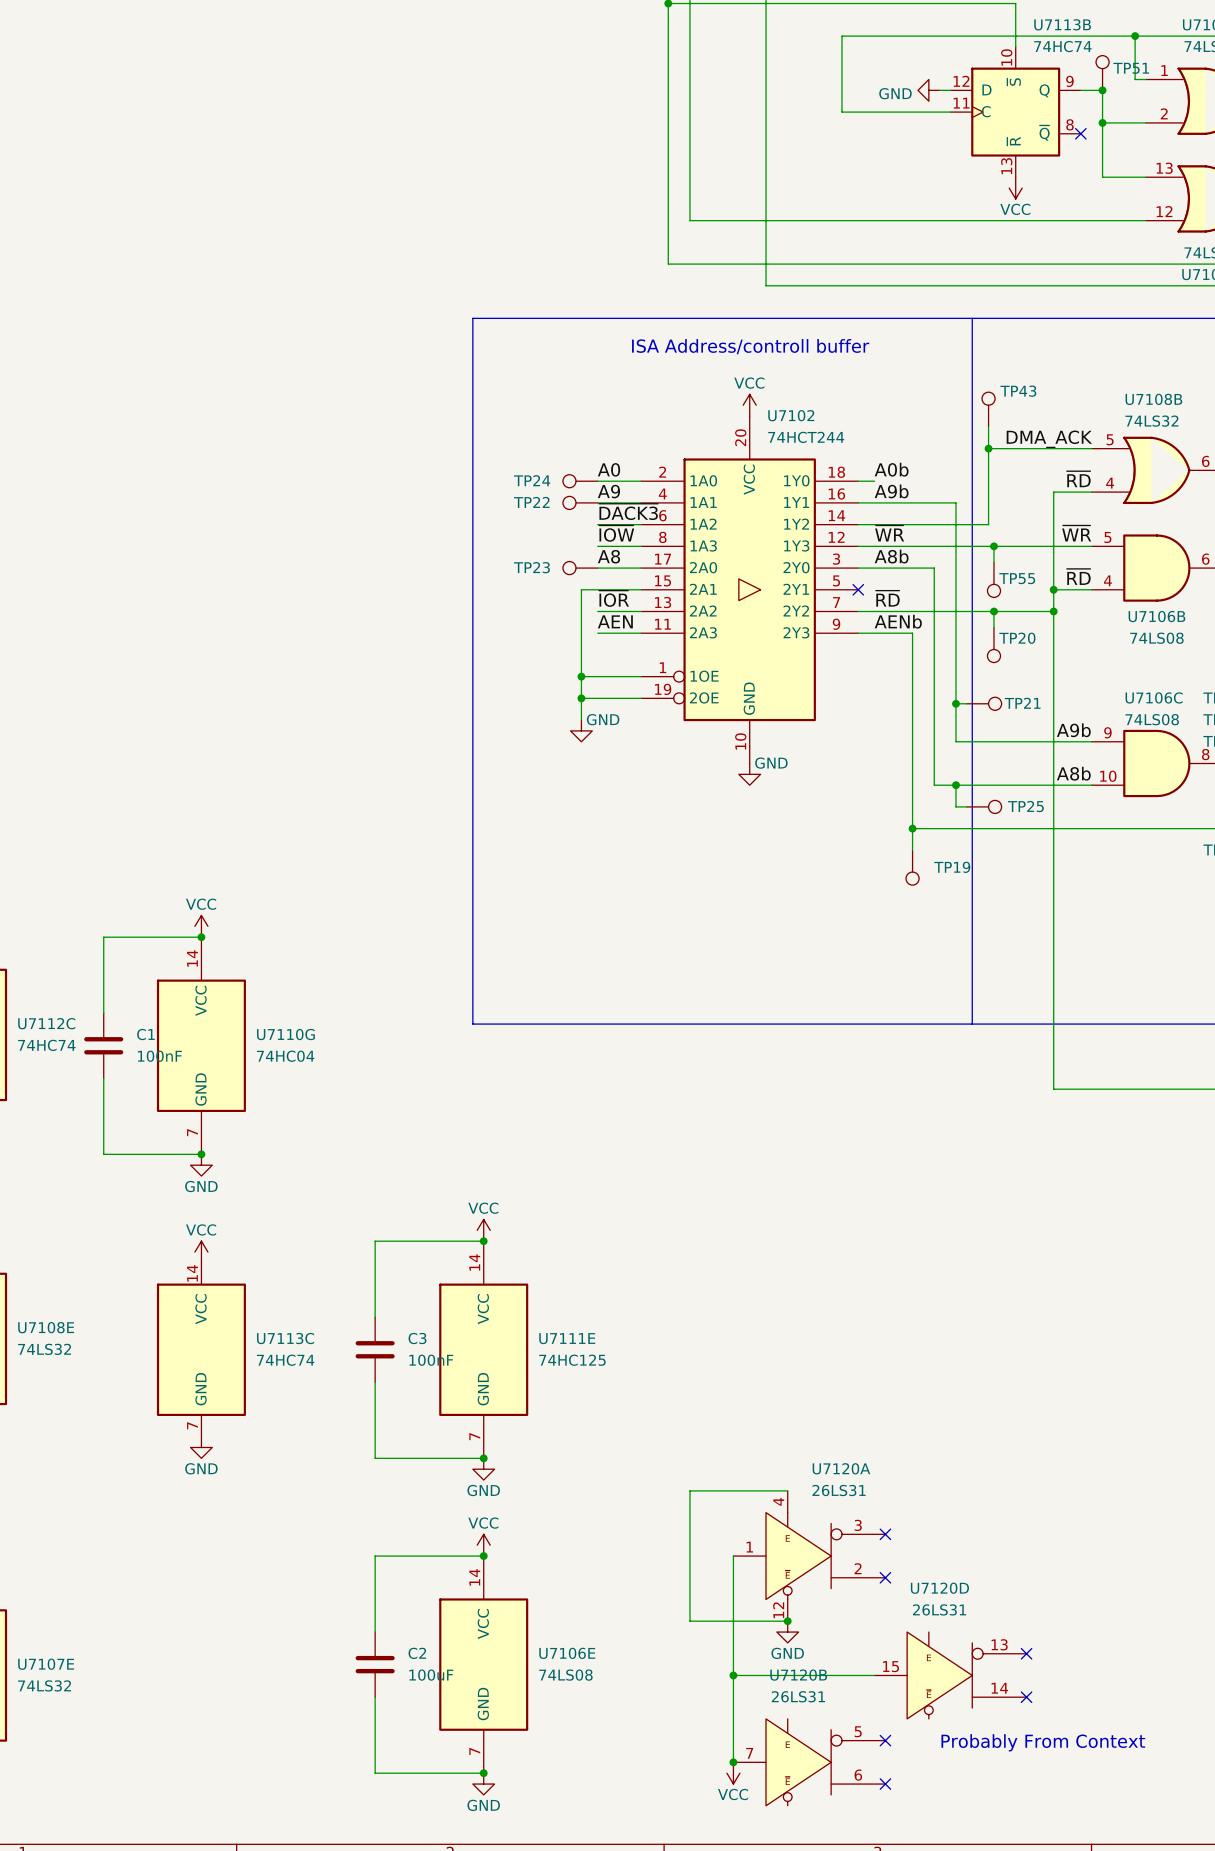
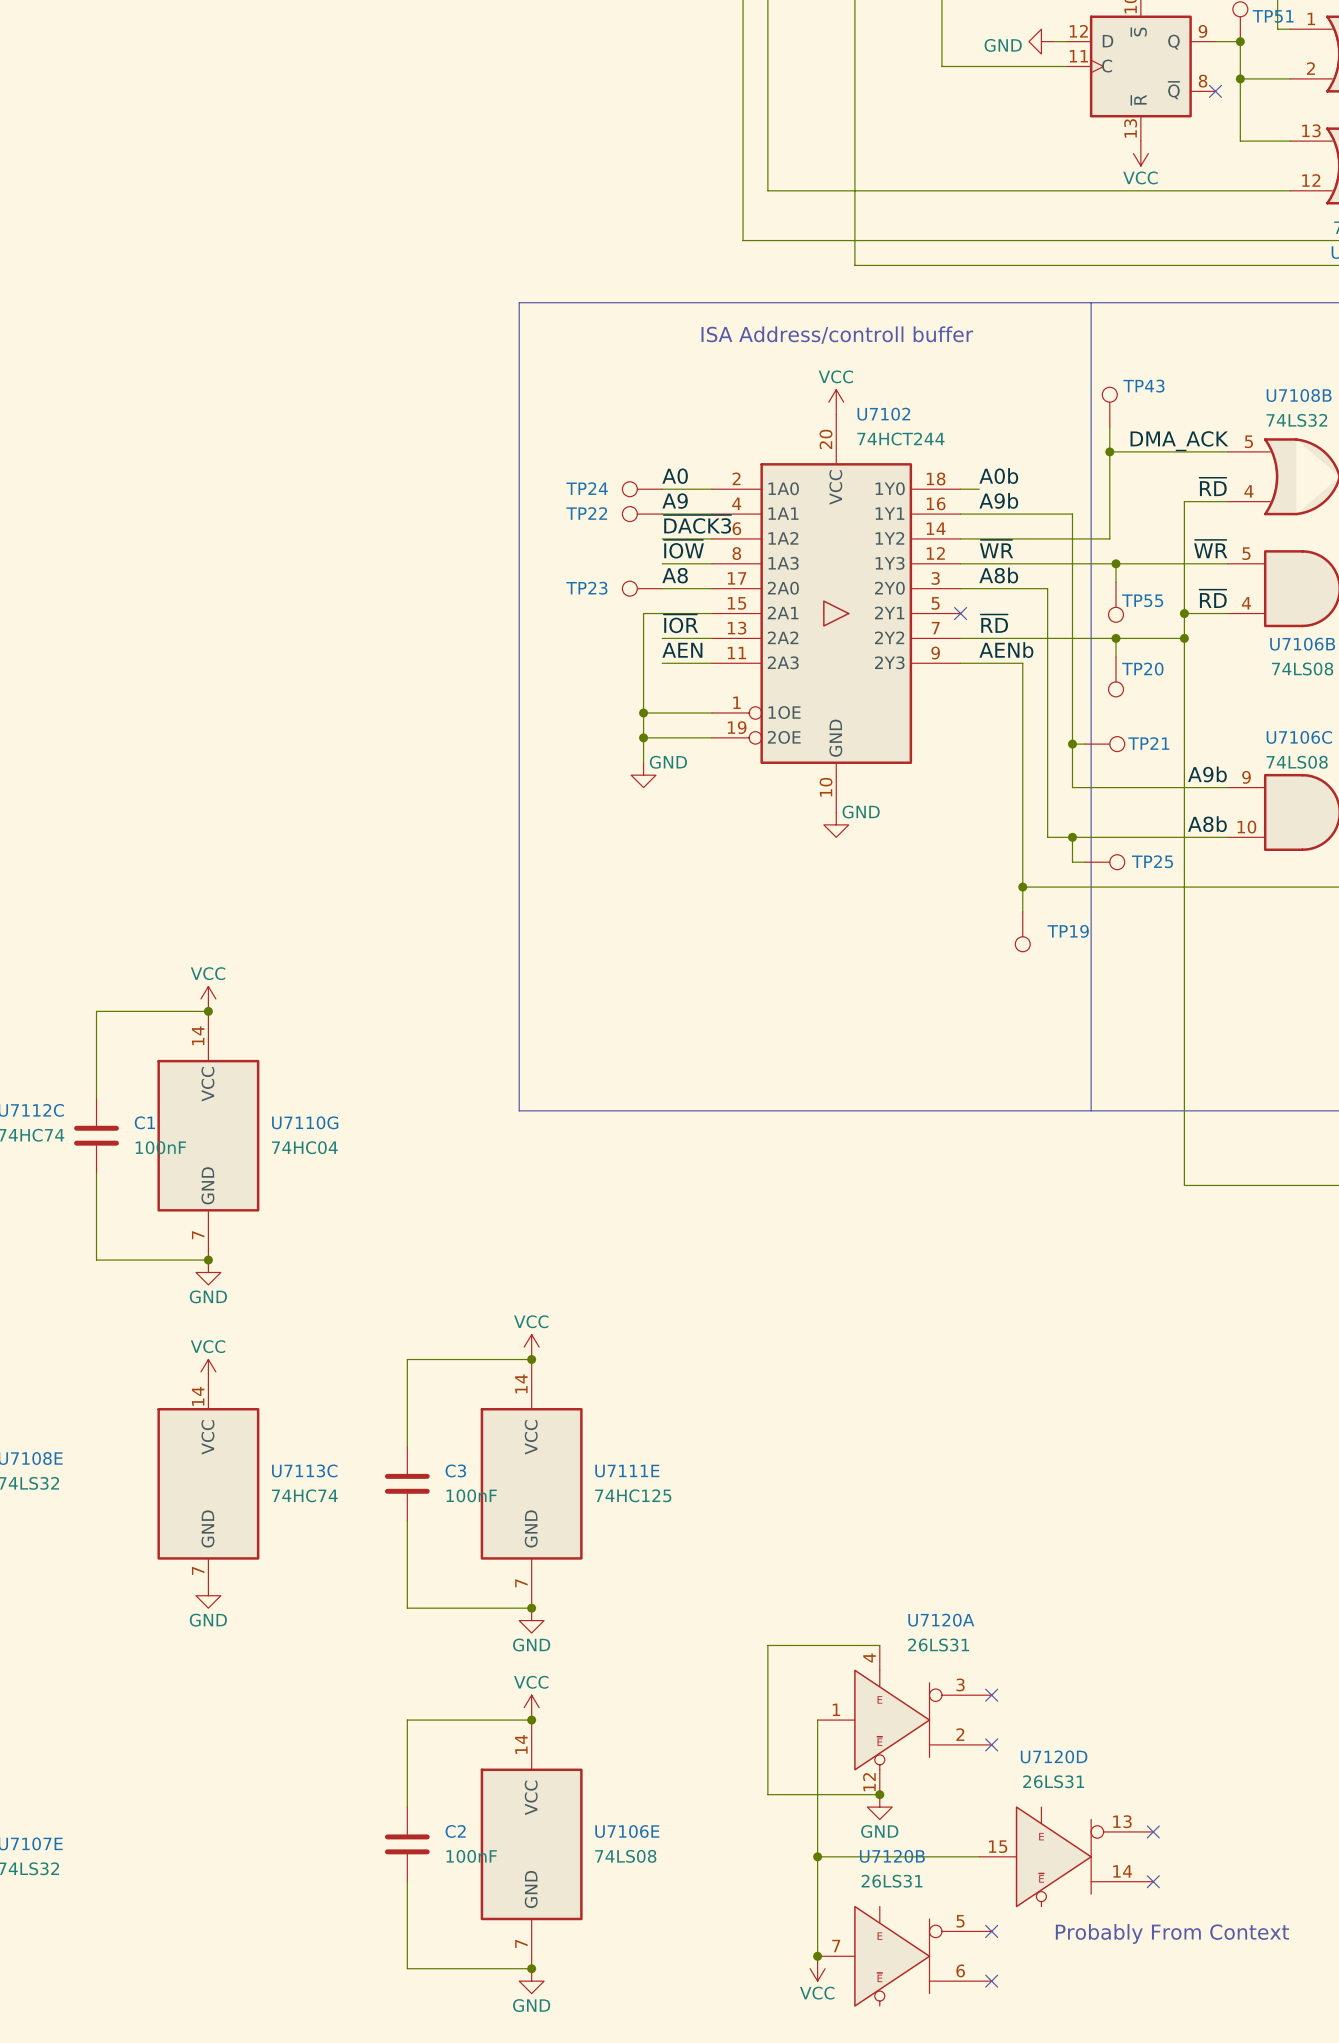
C2 value: 100uF (431, 1675) -> 100nF (471, 1856)

